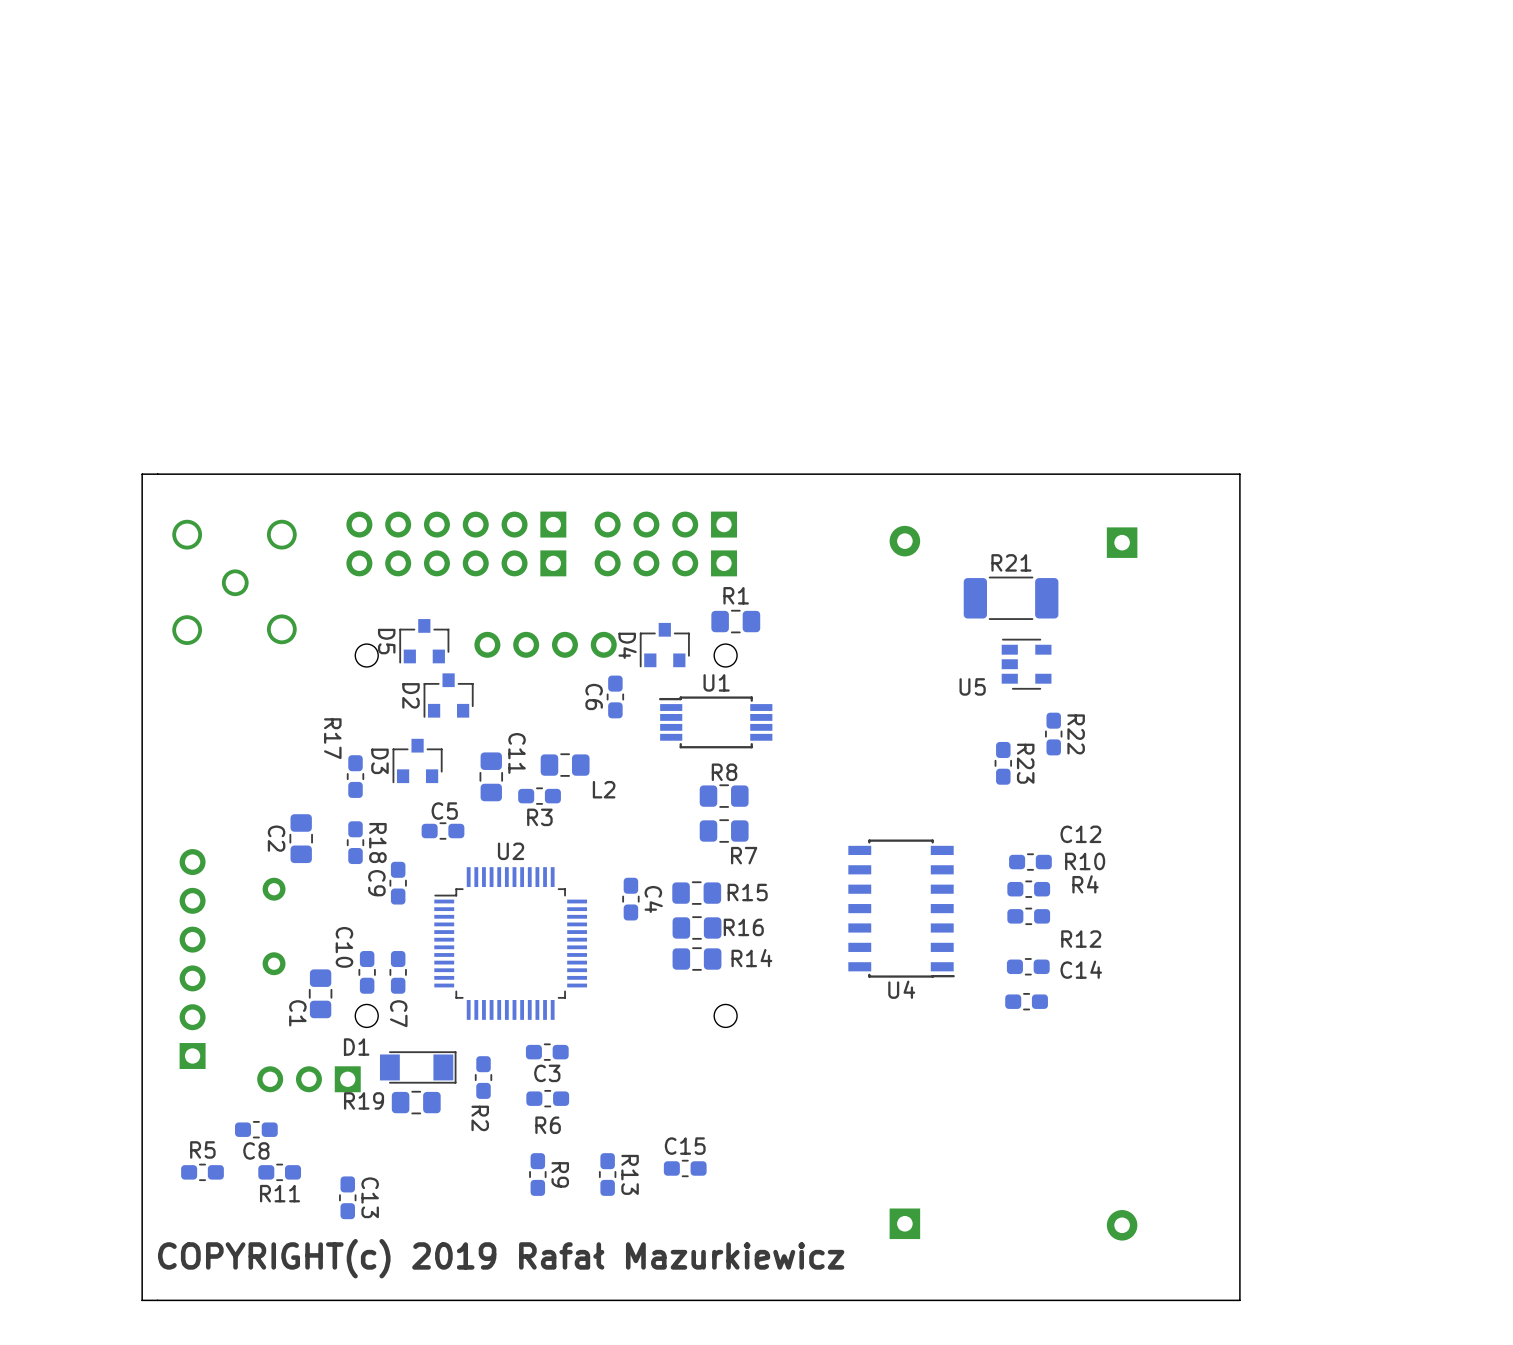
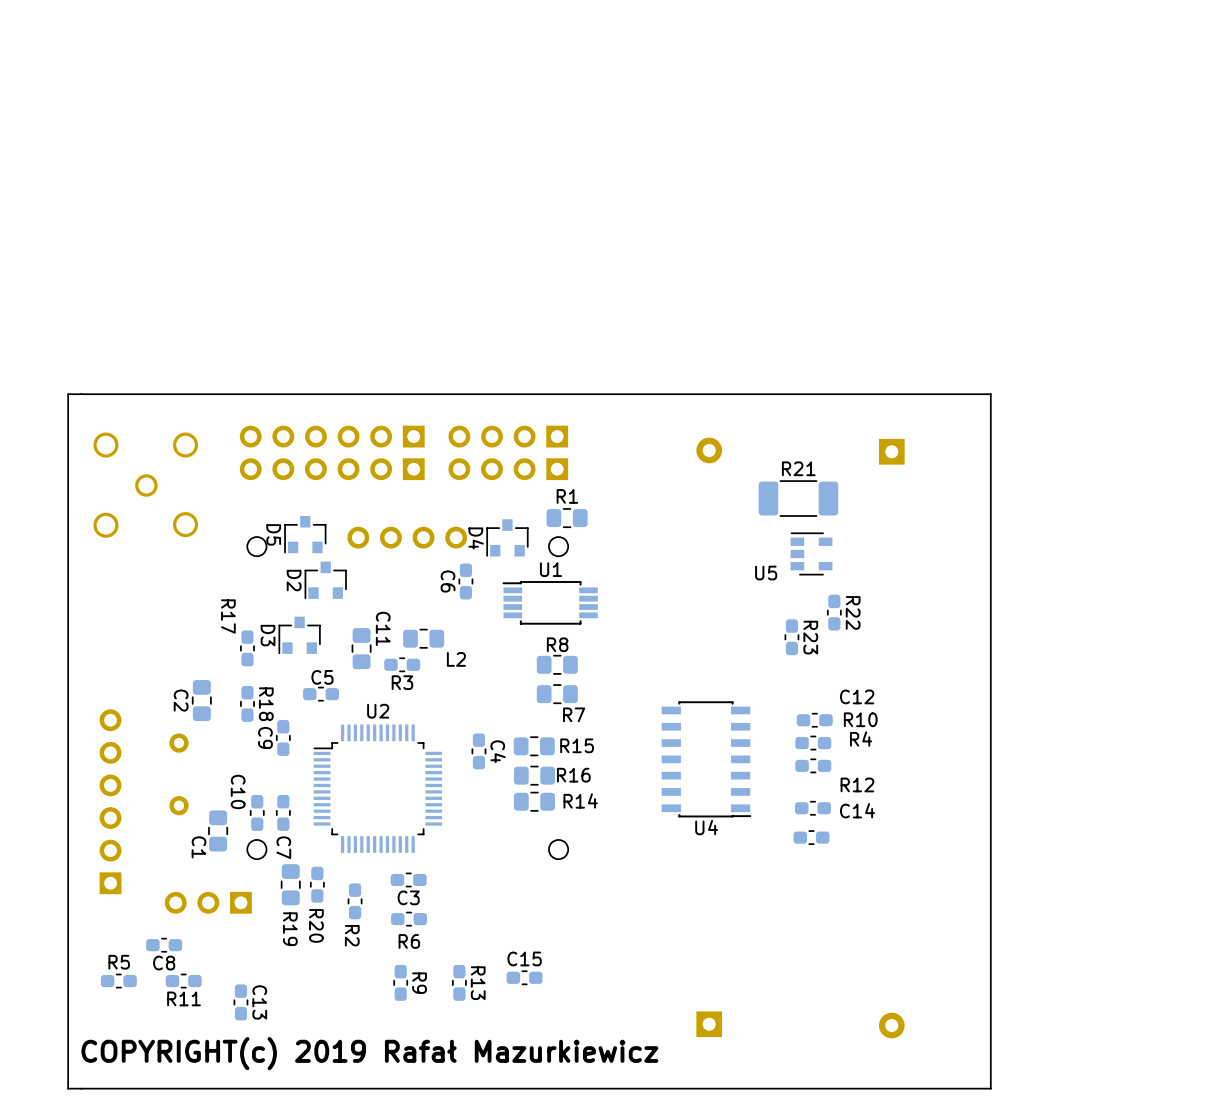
R20: none -> (317, 884)
D1: (418, 1067) -> none
R19 name position: R19 (364, 1100) -> R19 (290, 929)
R19 rotation: 0° (416, 1102) -> 90° clockwise (290, 884)
R19 position: (416, 1102) -> (290, 884)

